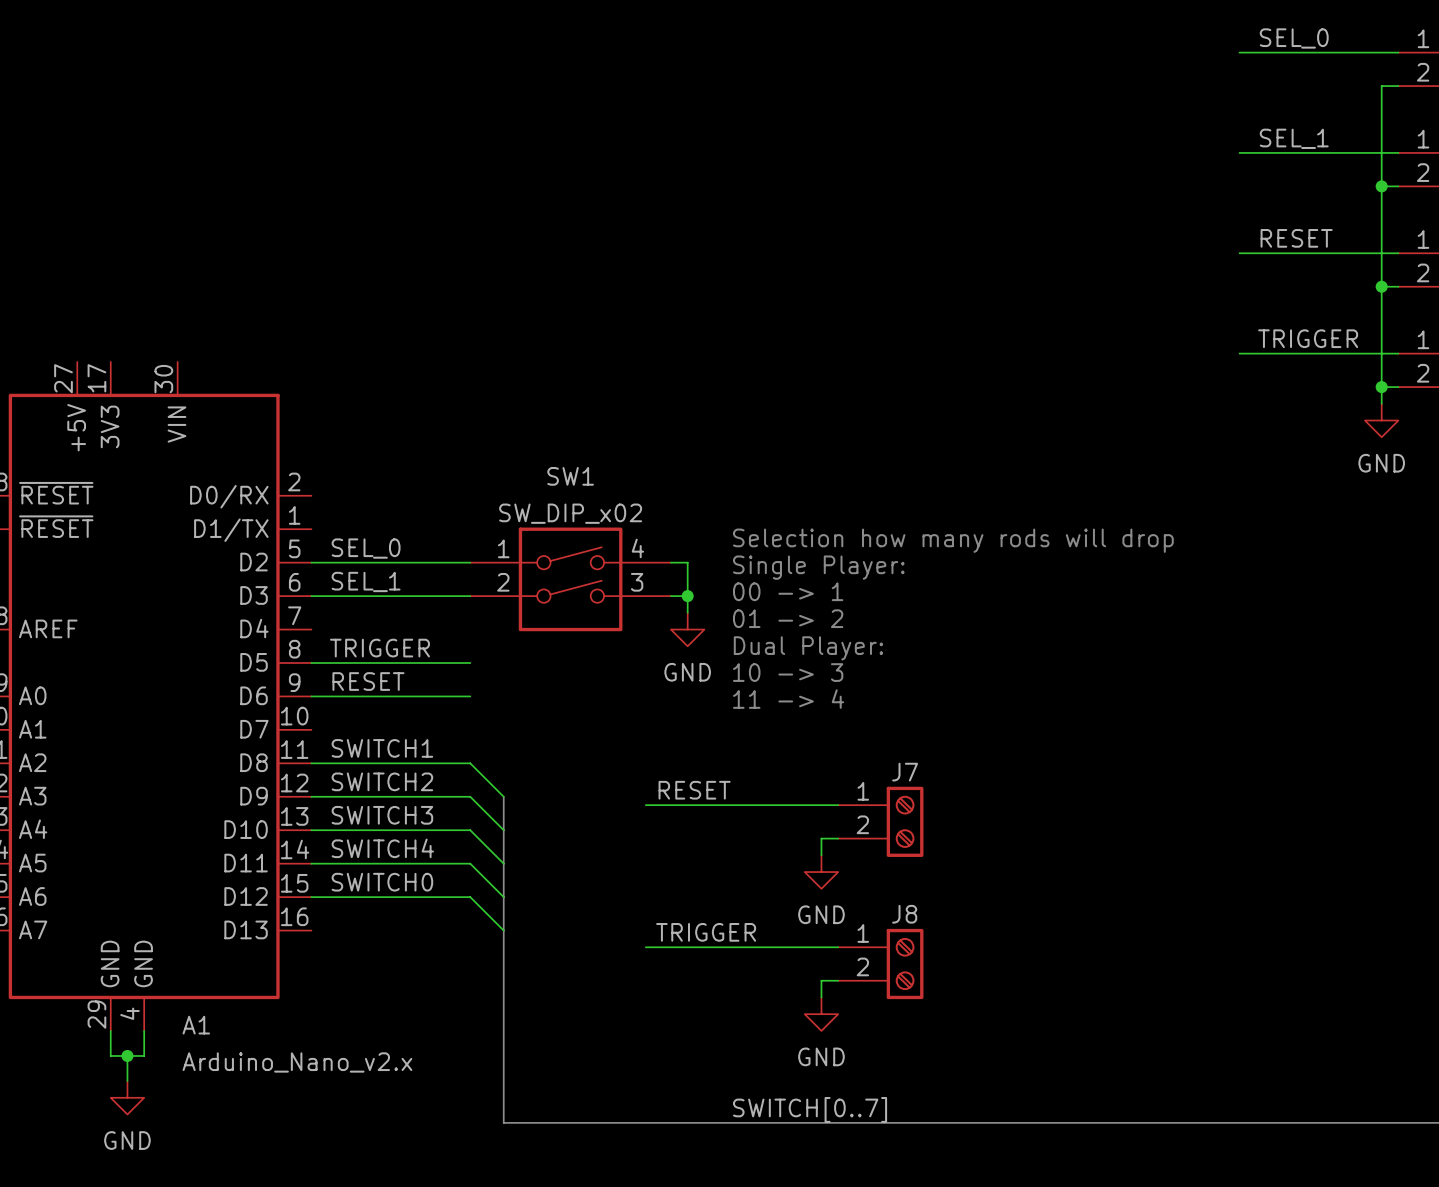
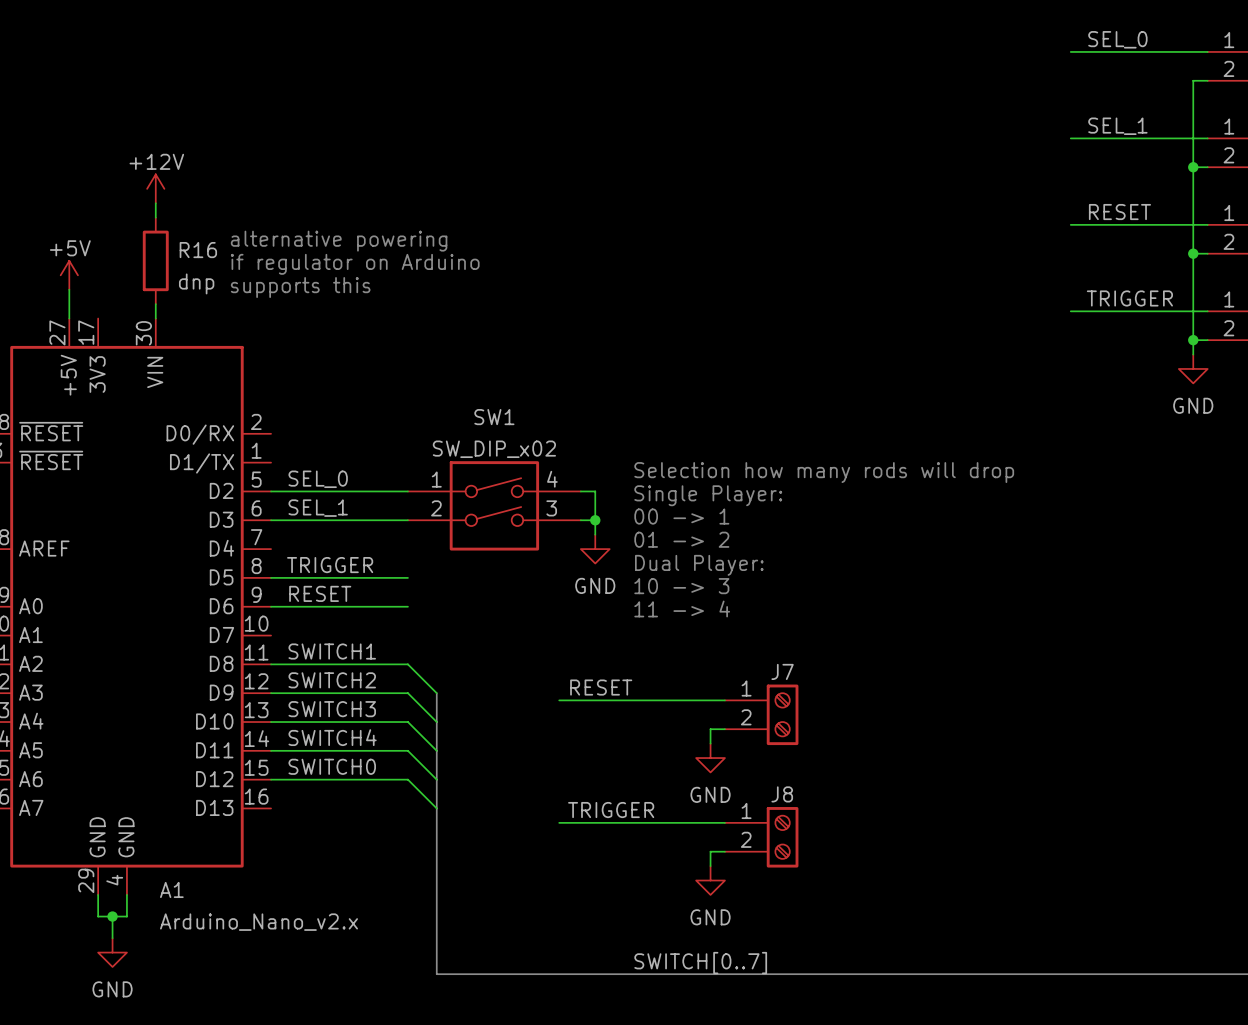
power symbol: none -> +12V (155, 188)
wire: none -> (155, 203) (155, 217)
text: none -> alternative powering (339, 241)
R16: none -> dnp (155, 260)
text: none -> if regulator on Arduino (355, 264)
power symbol: none -> +5V (69, 275)
text: none -> supports this (300, 287)
wire: none -> (69, 289) (69, 318)
wire: none -> (155, 304) (155, 318)

